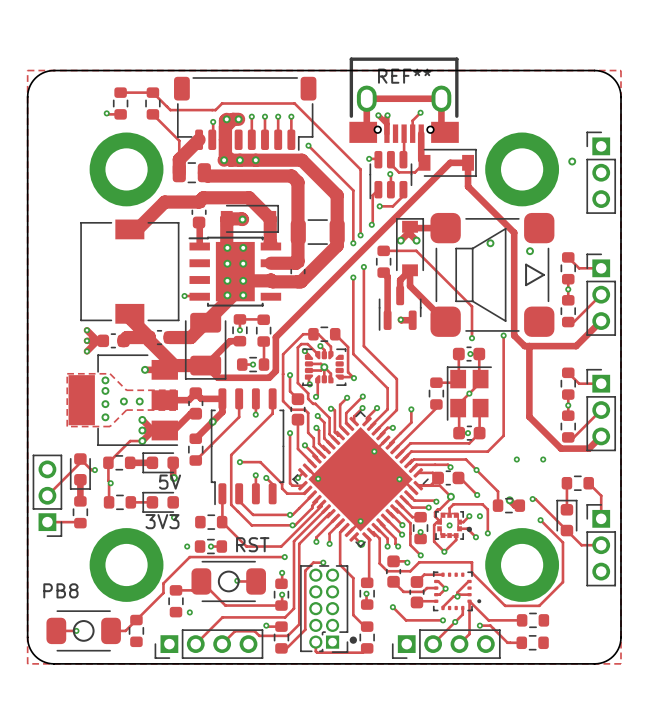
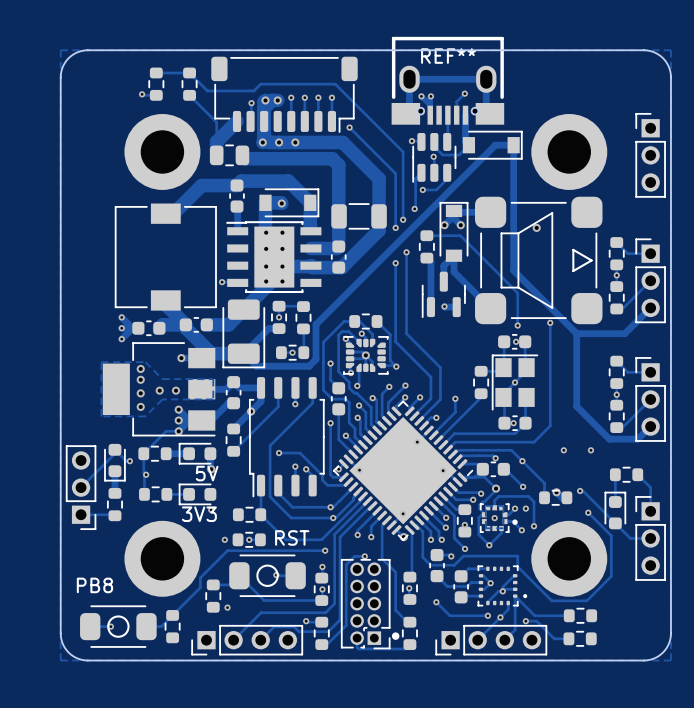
via: (572, 161) -> none
track: (468, 186) (514, 232) (514, 335) (524, 346) (529, 346) -> (513, 169) (513, 270) (576, 333)
via: (530, 251) -> none

